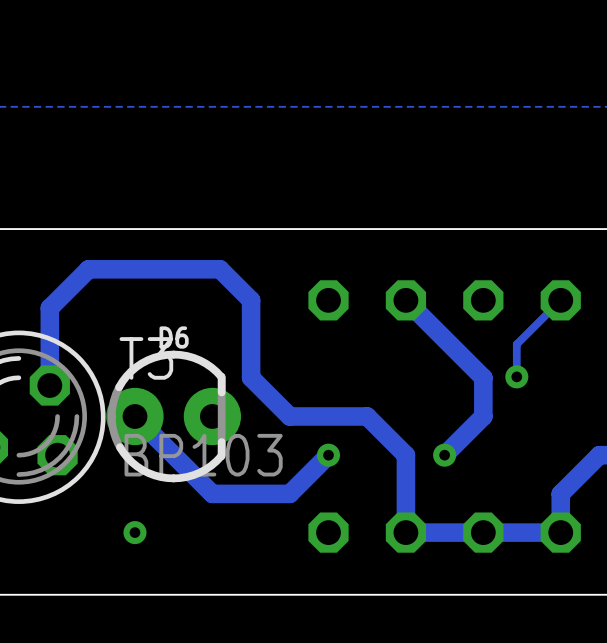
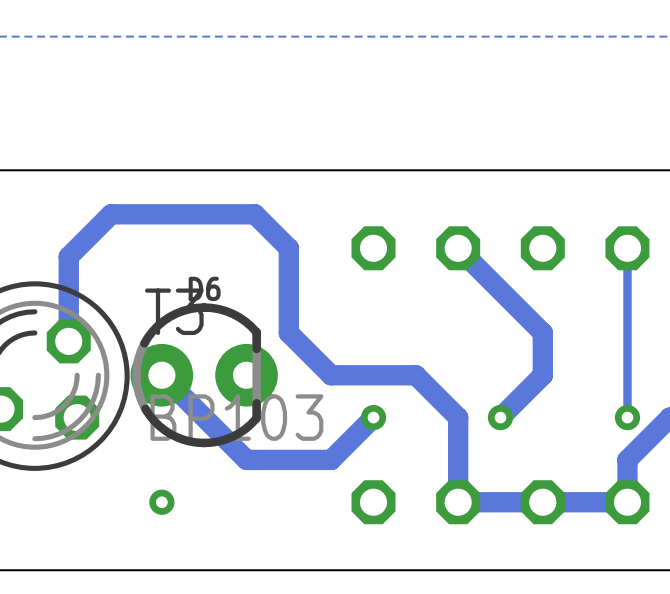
track: (560, 300) (516, 344) (516, 376) -> (627, 248) (627, 417)
via: (516, 376) -> none
via: none -> (627, 417)

